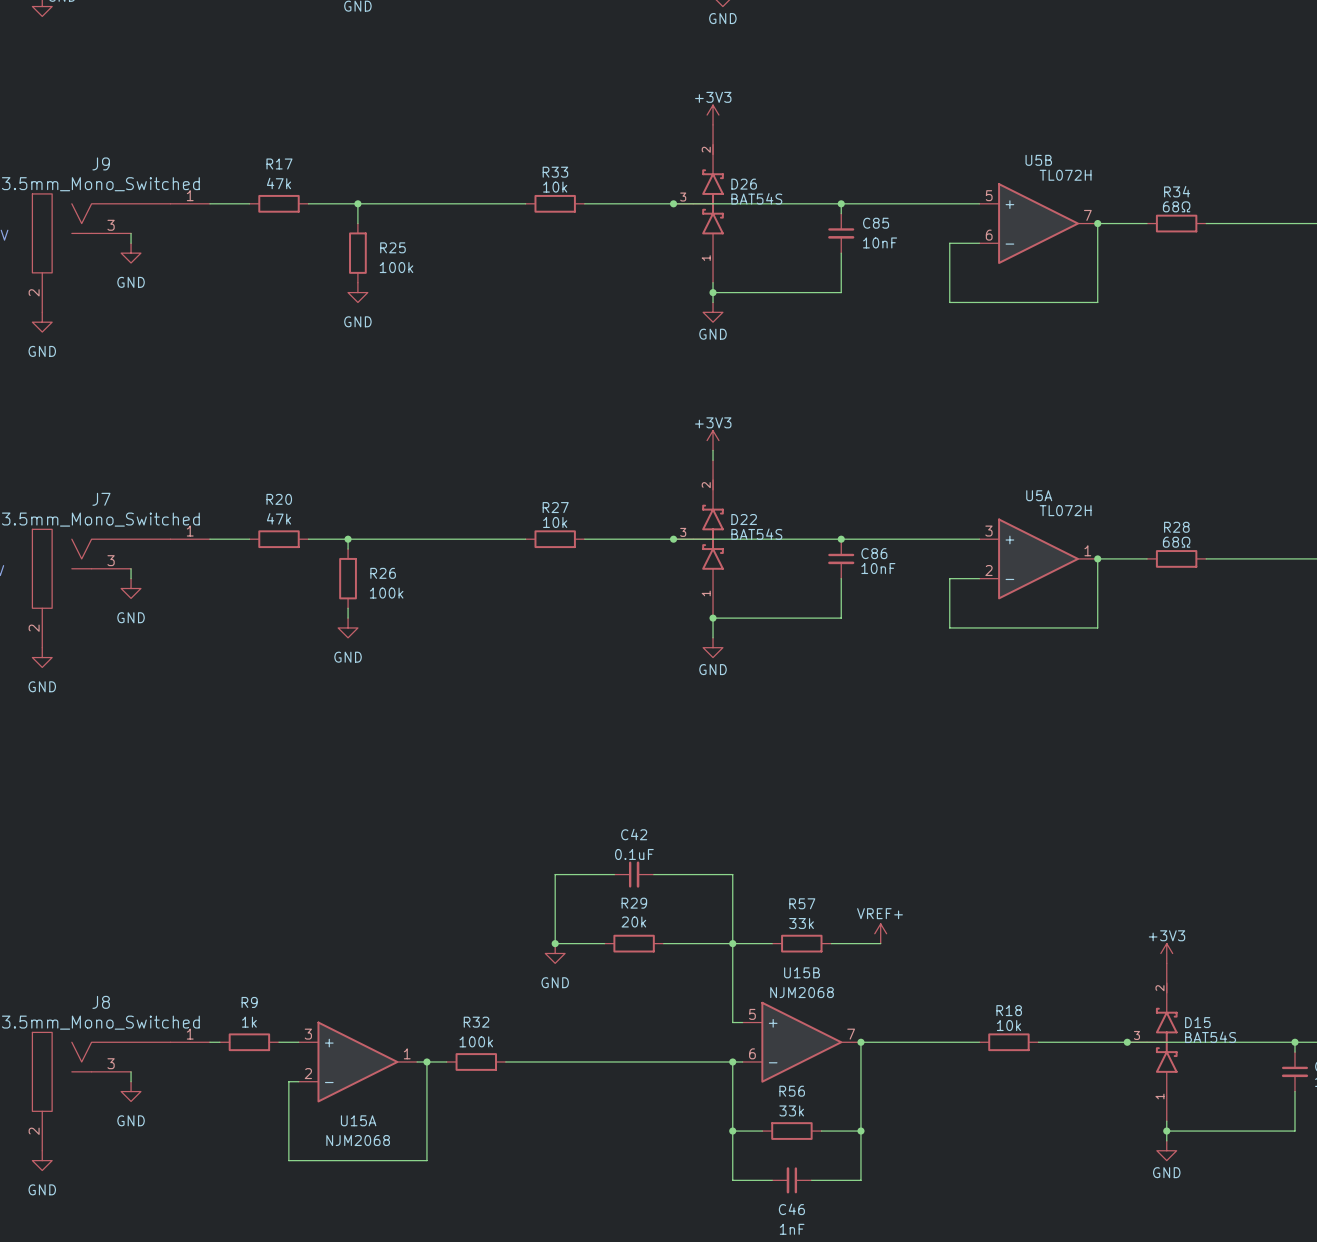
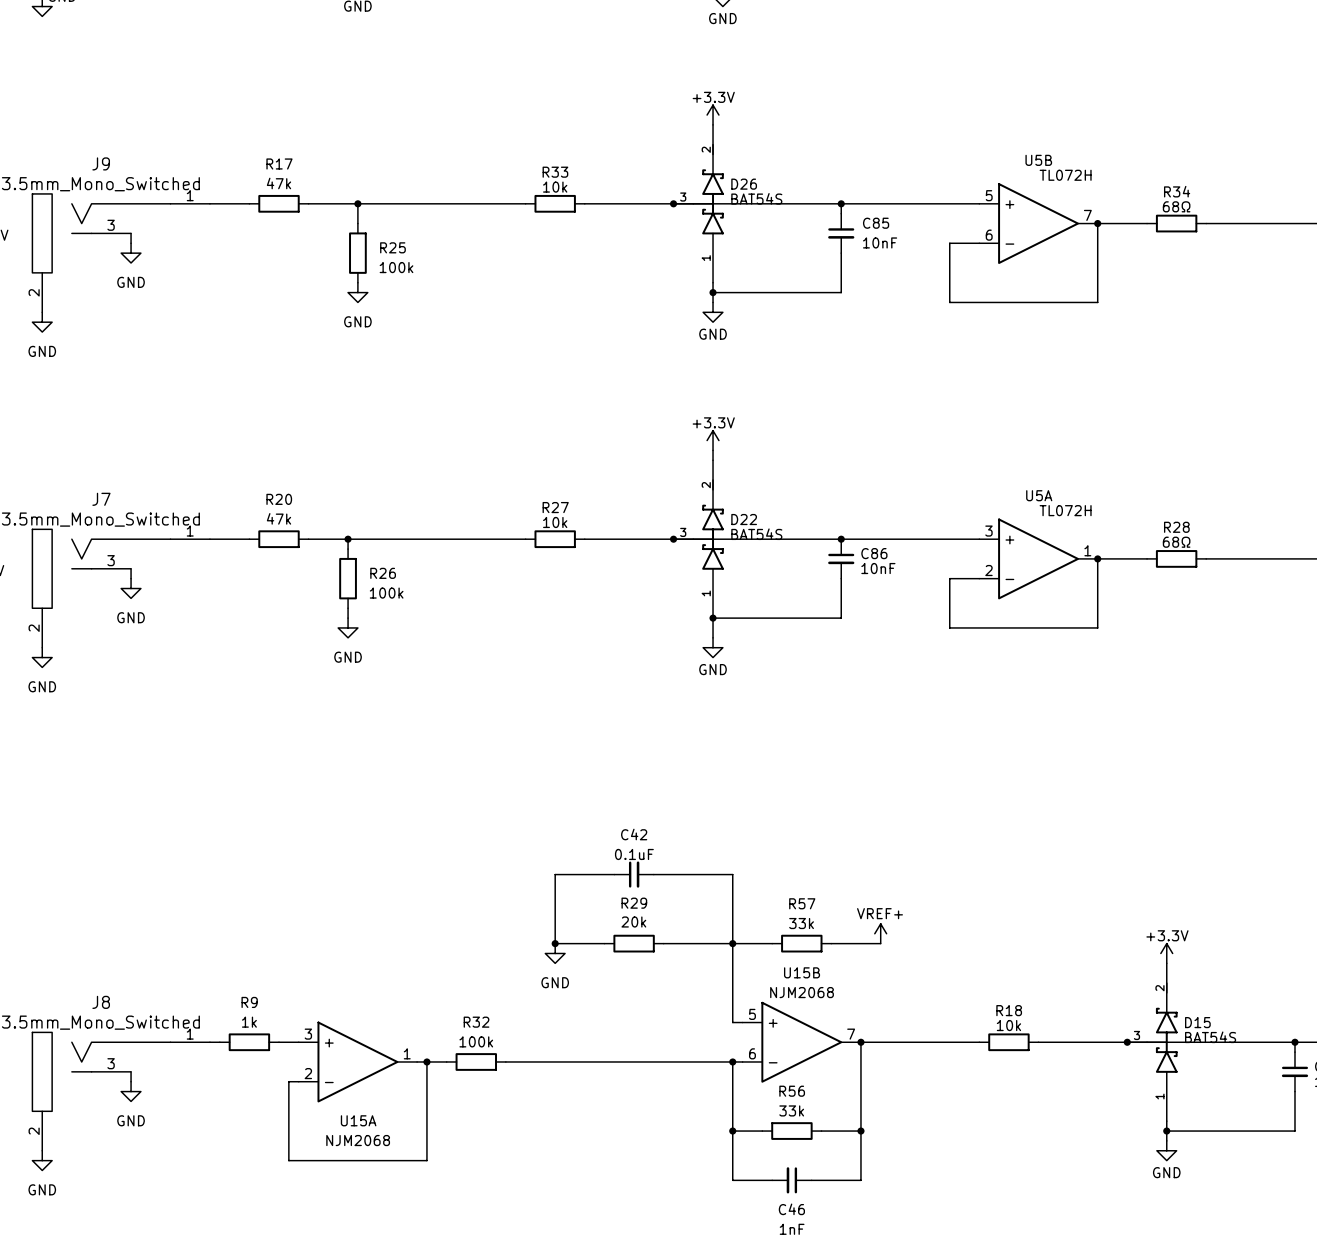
power symbol: +3V3 (713, 115) -> +3.3V (713, 115)
power symbol: +3V3 (713, 440) -> +3.3V (713, 440)
power symbol: +3V3 (1166, 953) -> +3.3V (1166, 953)

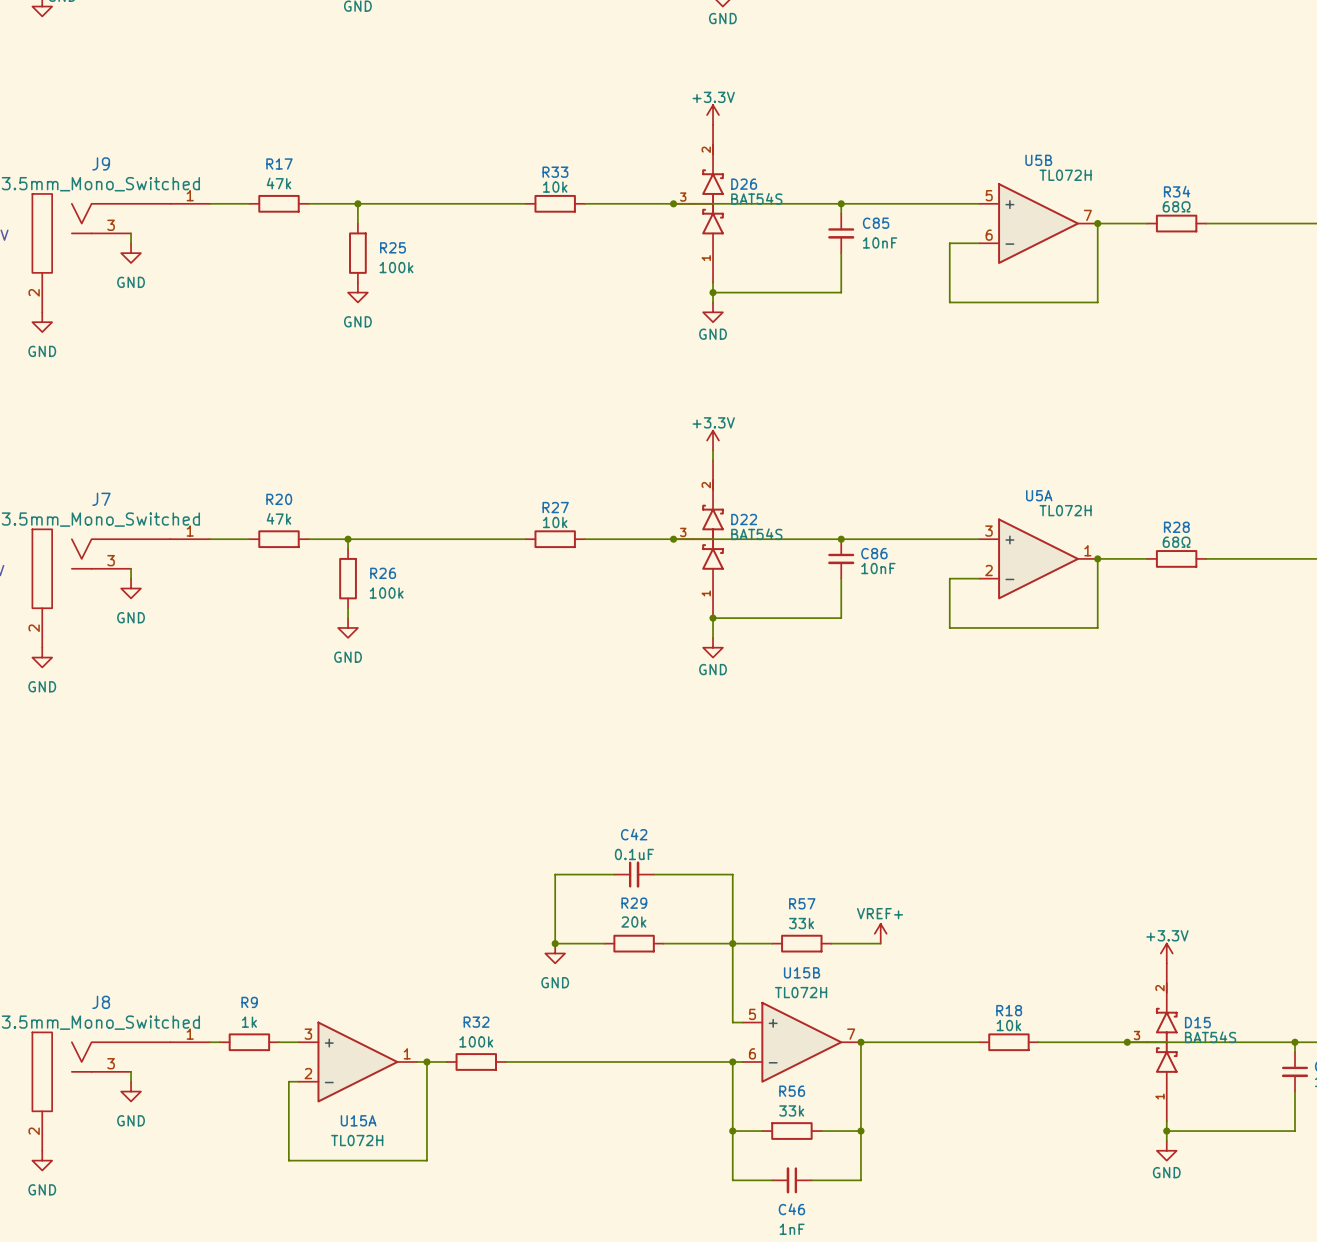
U15B value: NJM2068 (802, 992) -> TL072H (801, 992)
U15A value: NJM2068 (358, 1140) -> TL072H (357, 1140)

